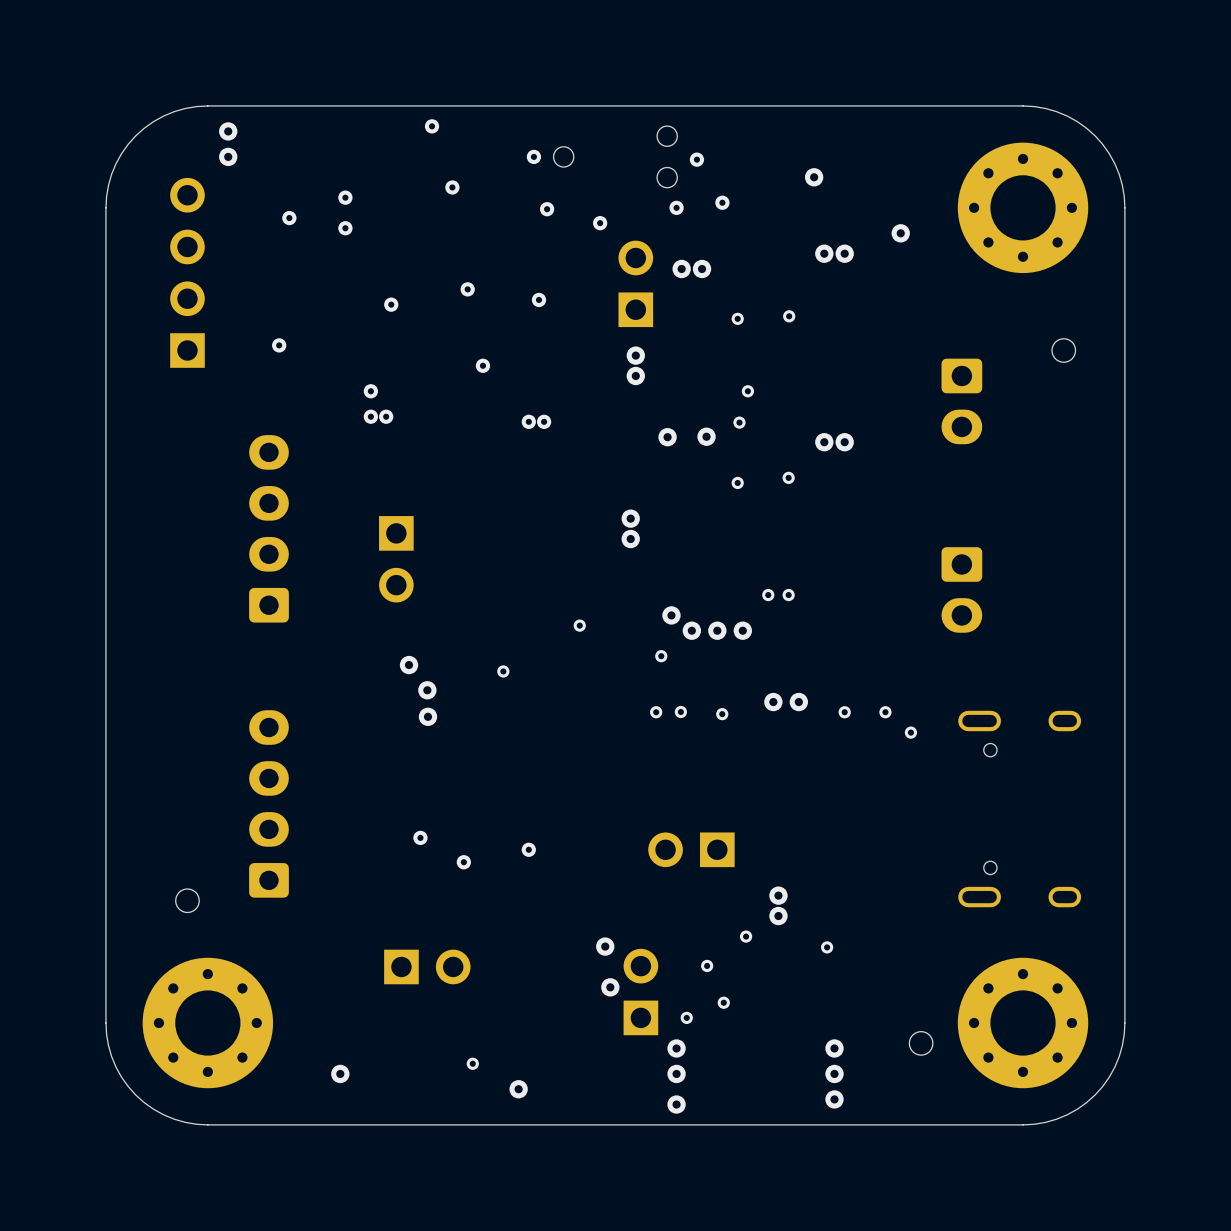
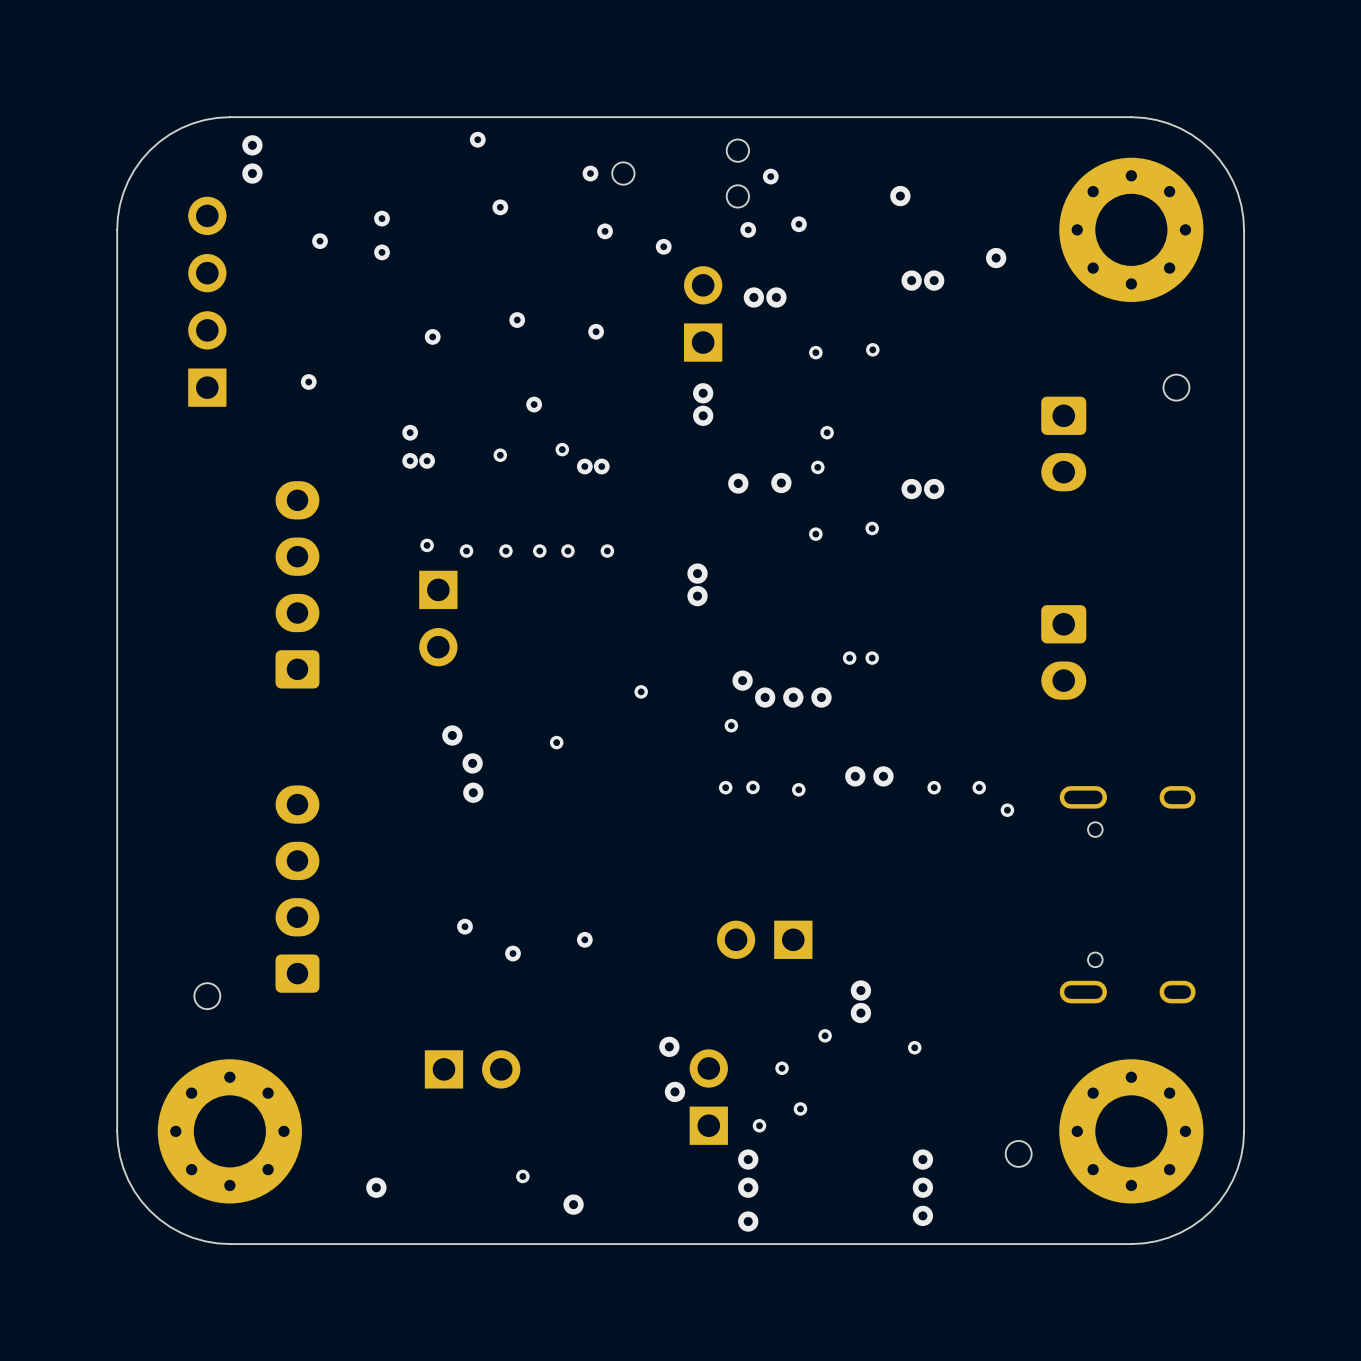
via: none -> (562, 449)
via: none -> (500, 455)
via: none -> (427, 545)
via: none -> (466, 551)
via: none -> (505, 551)
via: none -> (539, 551)
via: none -> (567, 551)
via: none -> (607, 551)

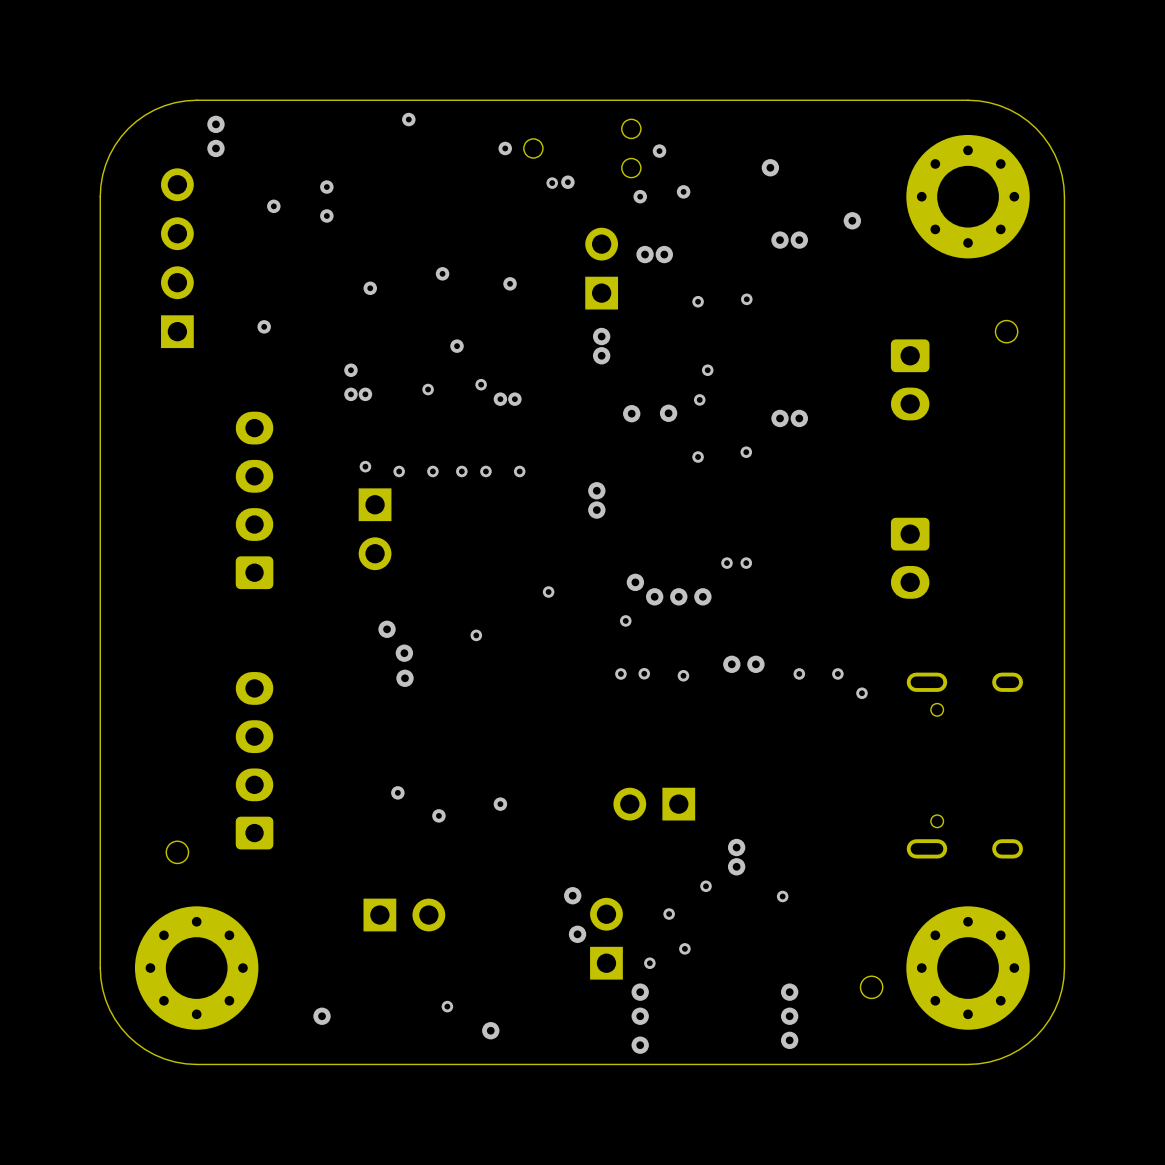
via: (500, 207) -> none
via: none -> (567, 182)
via: none -> (552, 183)
via: (605, 231) -> none
via: (663, 246) -> none

